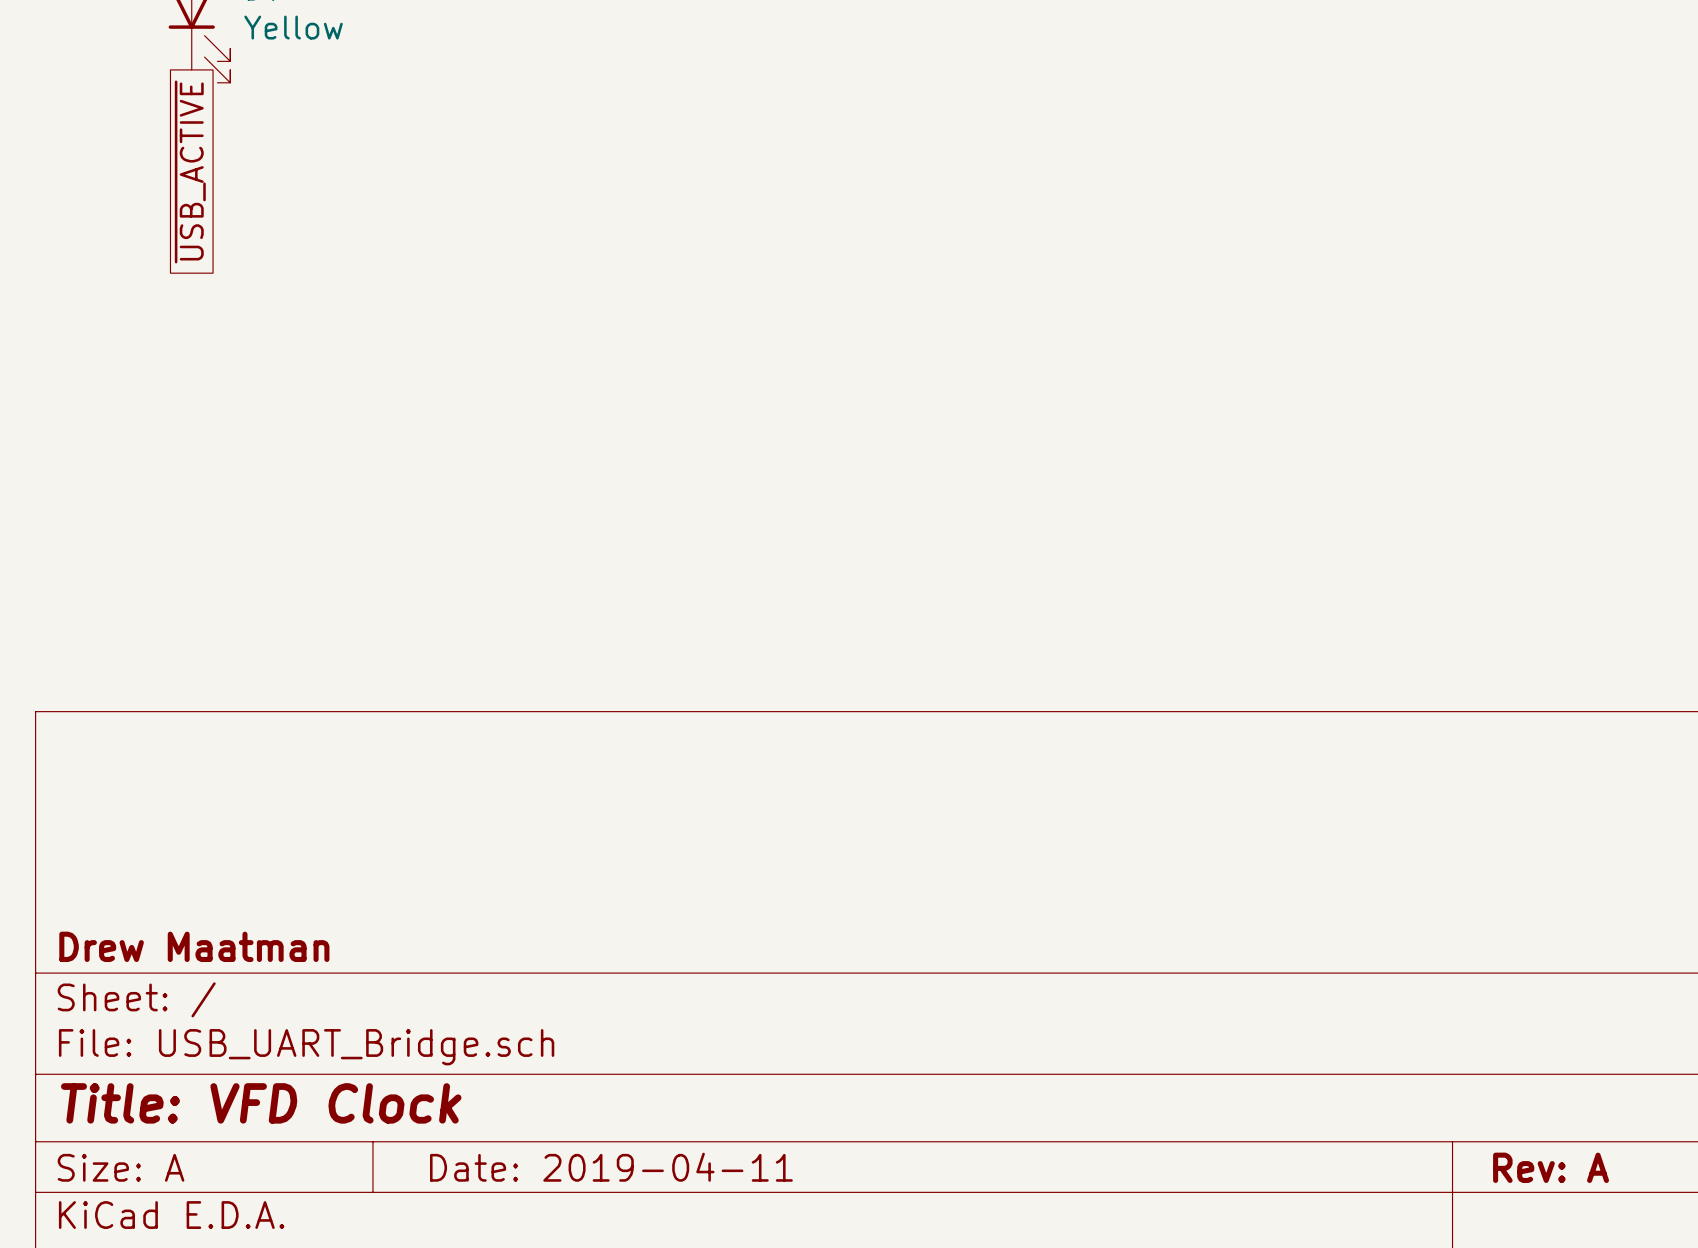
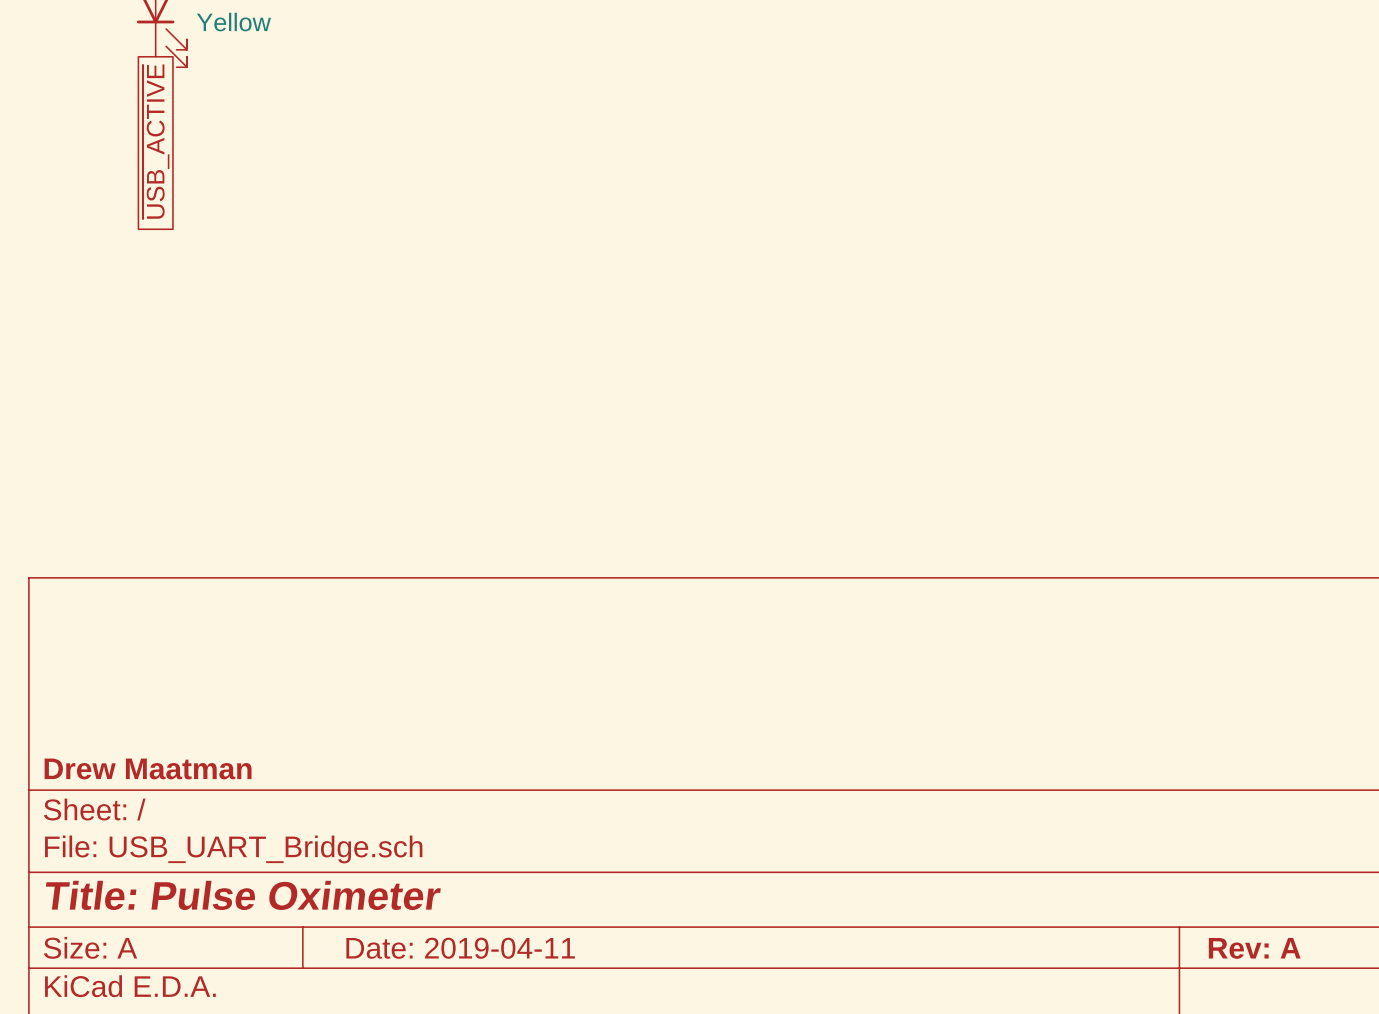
title block: Title: VFD Clock (261, 1103) -> Title: Pulse Oximeter (243, 895)

